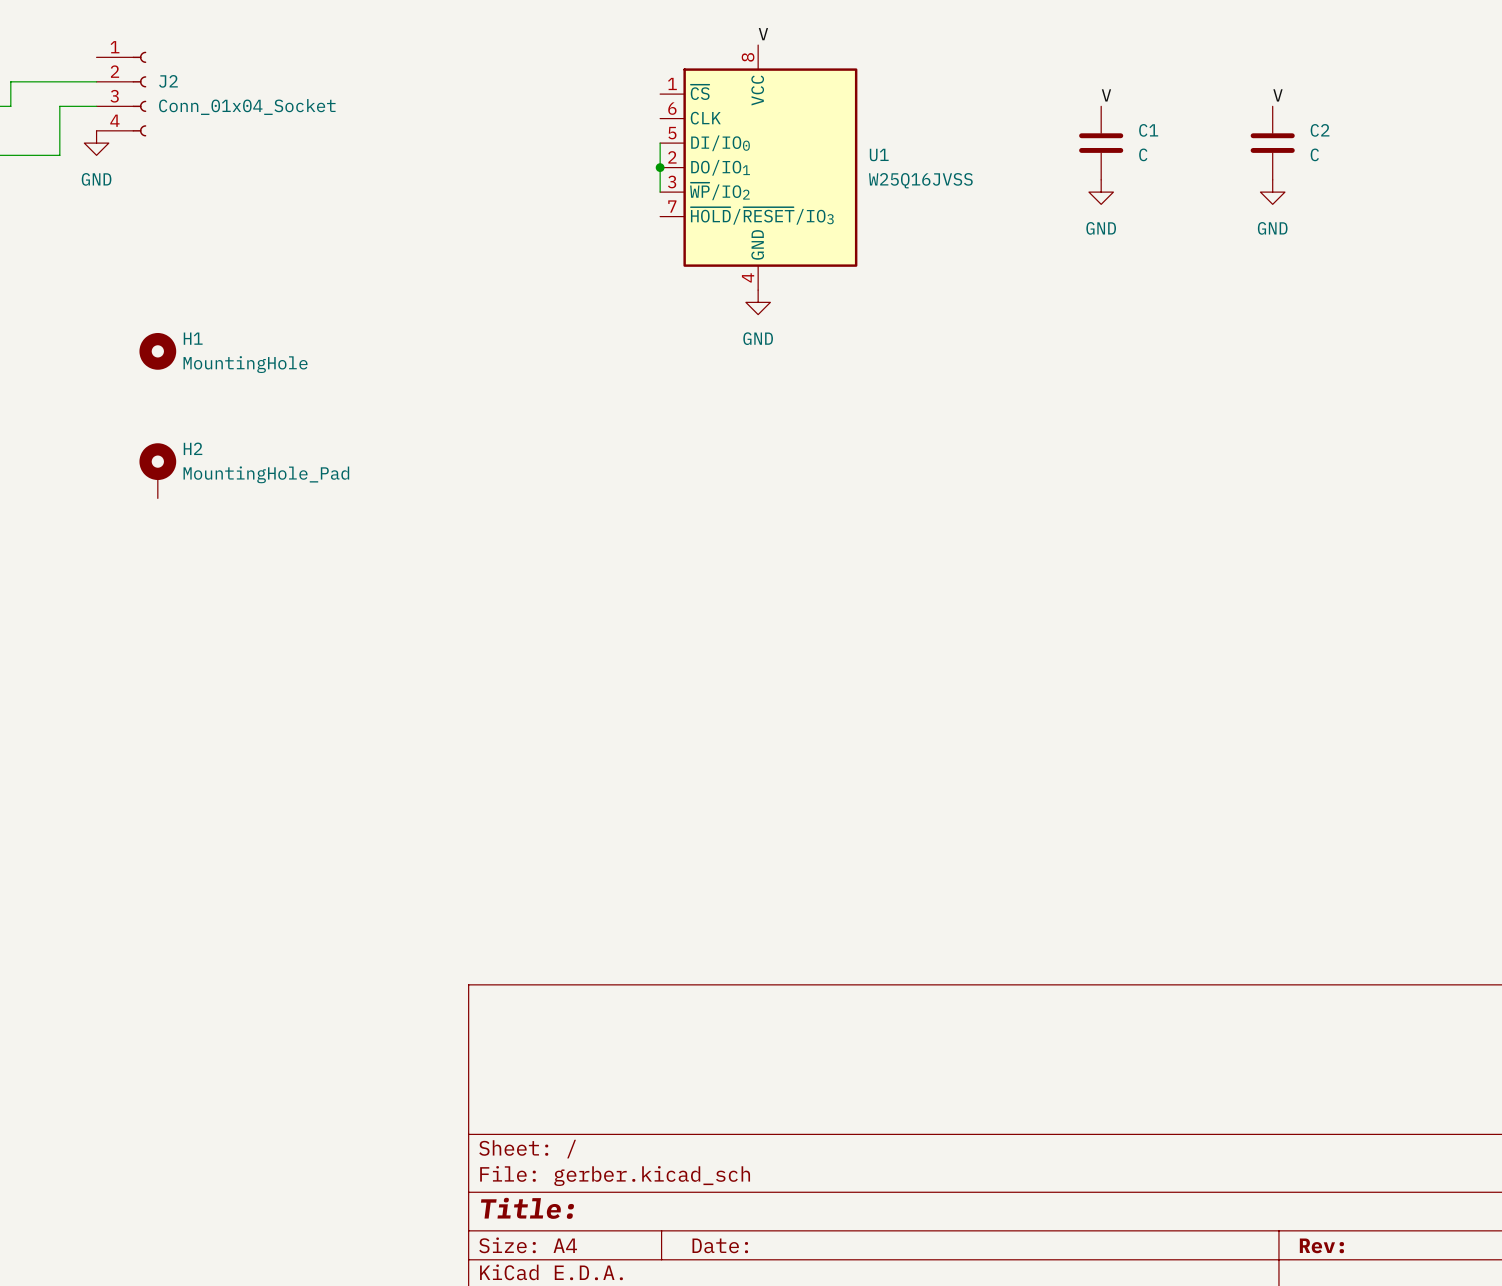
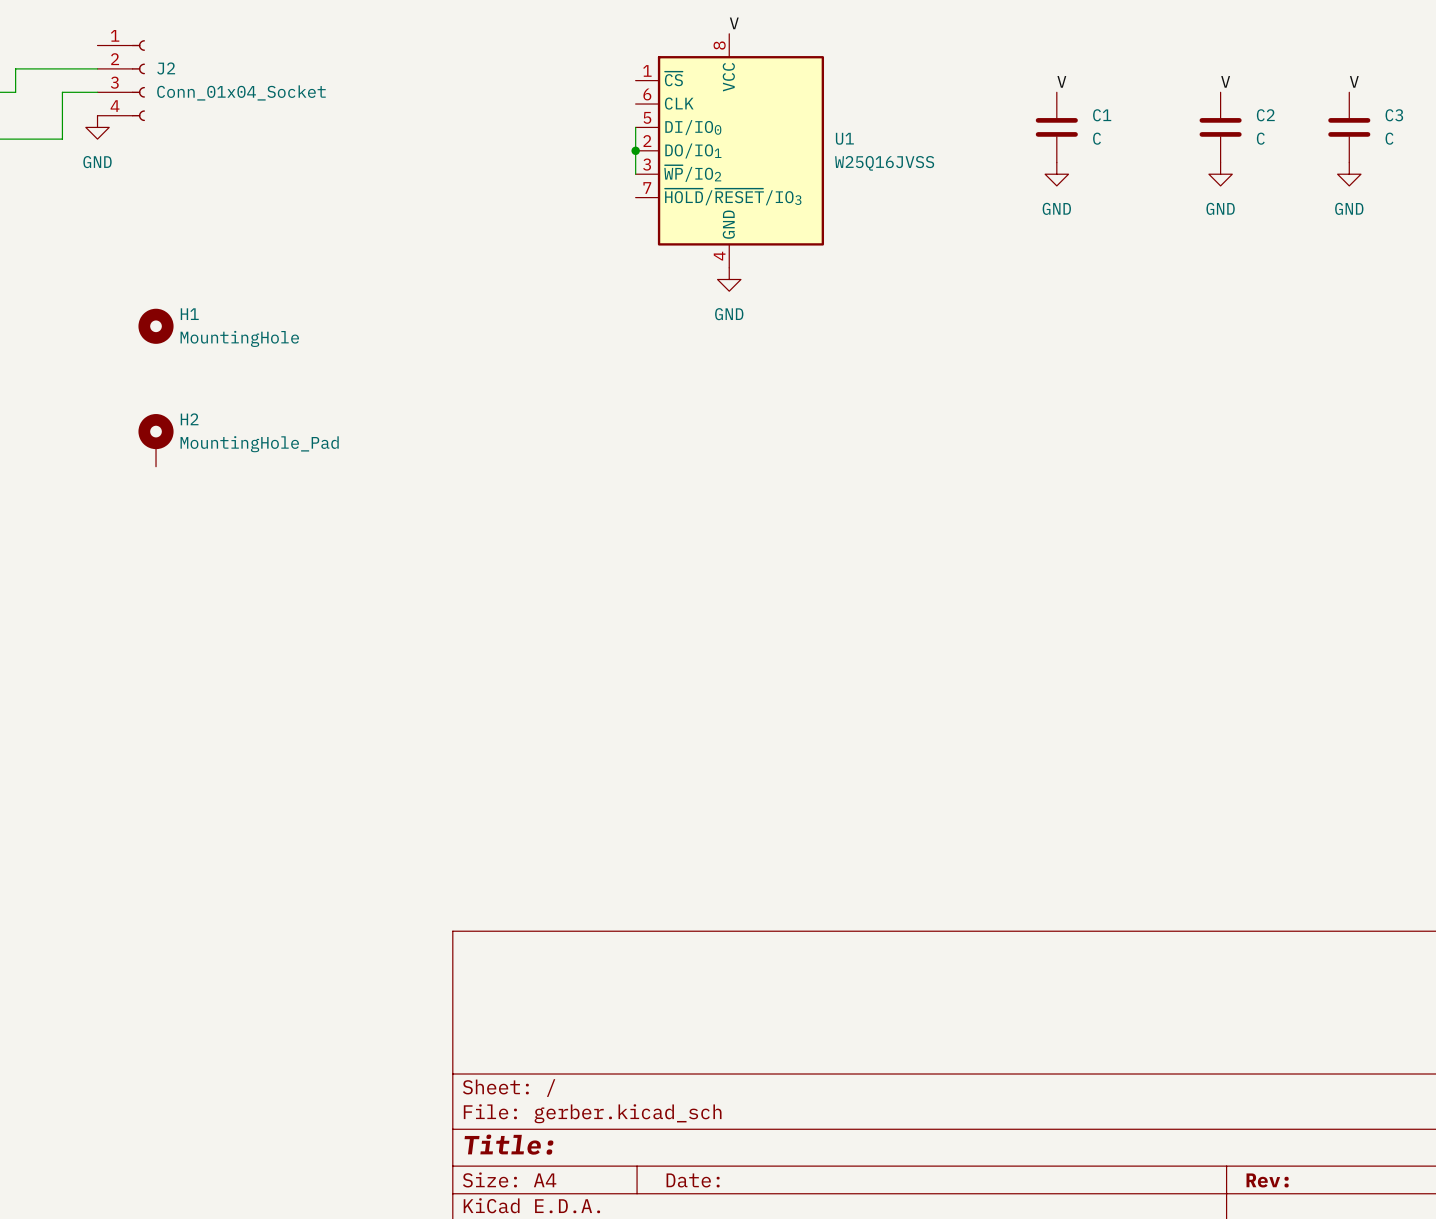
label: none -> V (1354, 81)
C3: none -> C (1349, 127)
power symbol: none -> GND (1349, 174)

